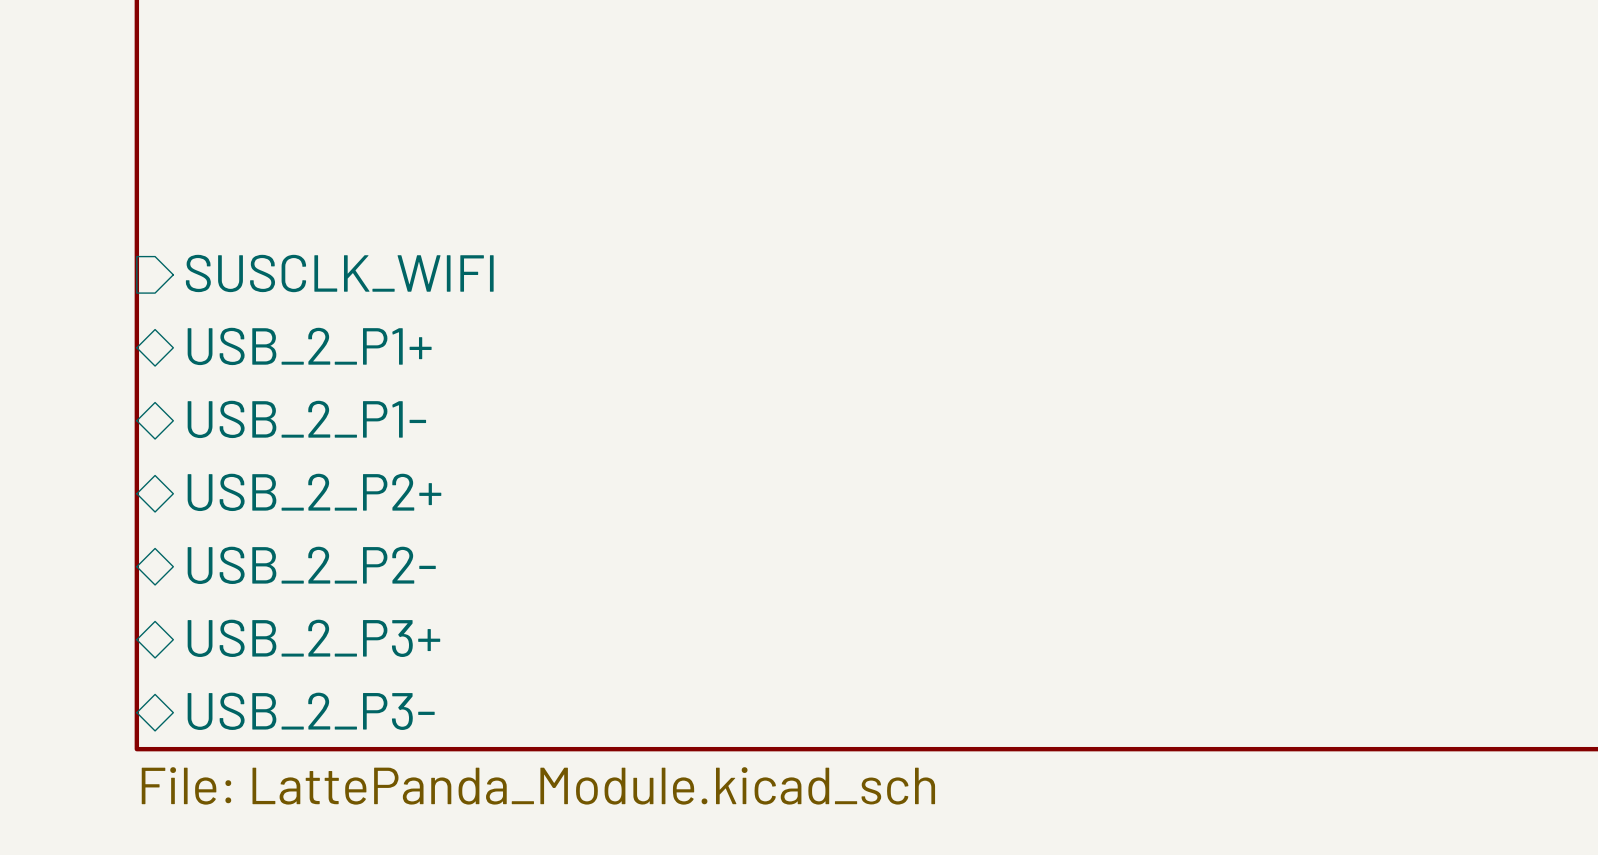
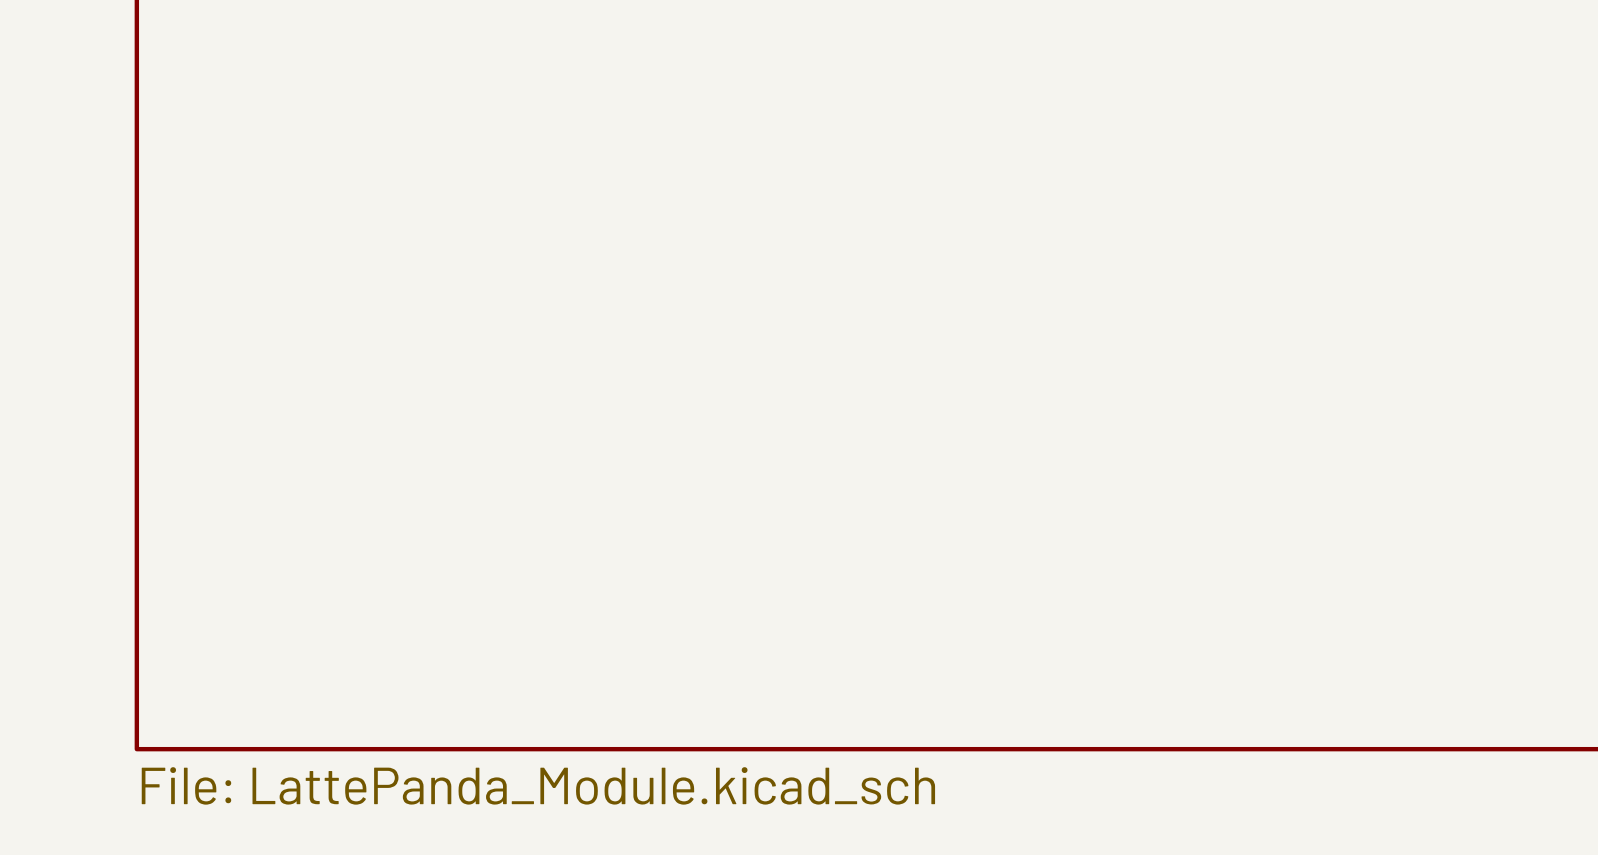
sheet pin: SUSCLK_WIFI (339, 273) -> none
sheet pin: USB_2_P1+ (309, 346) -> none
sheet pin: USB_2_P1- (306, 419) -> none
sheet pin: USB_2_P2+ (314, 492) -> none
sheet pin: USB_2_P2- (311, 565) -> none
sheet pin: USB_2_P3+ (313, 638) -> none
sheet pin: USB_2_P3- (311, 711) -> none

